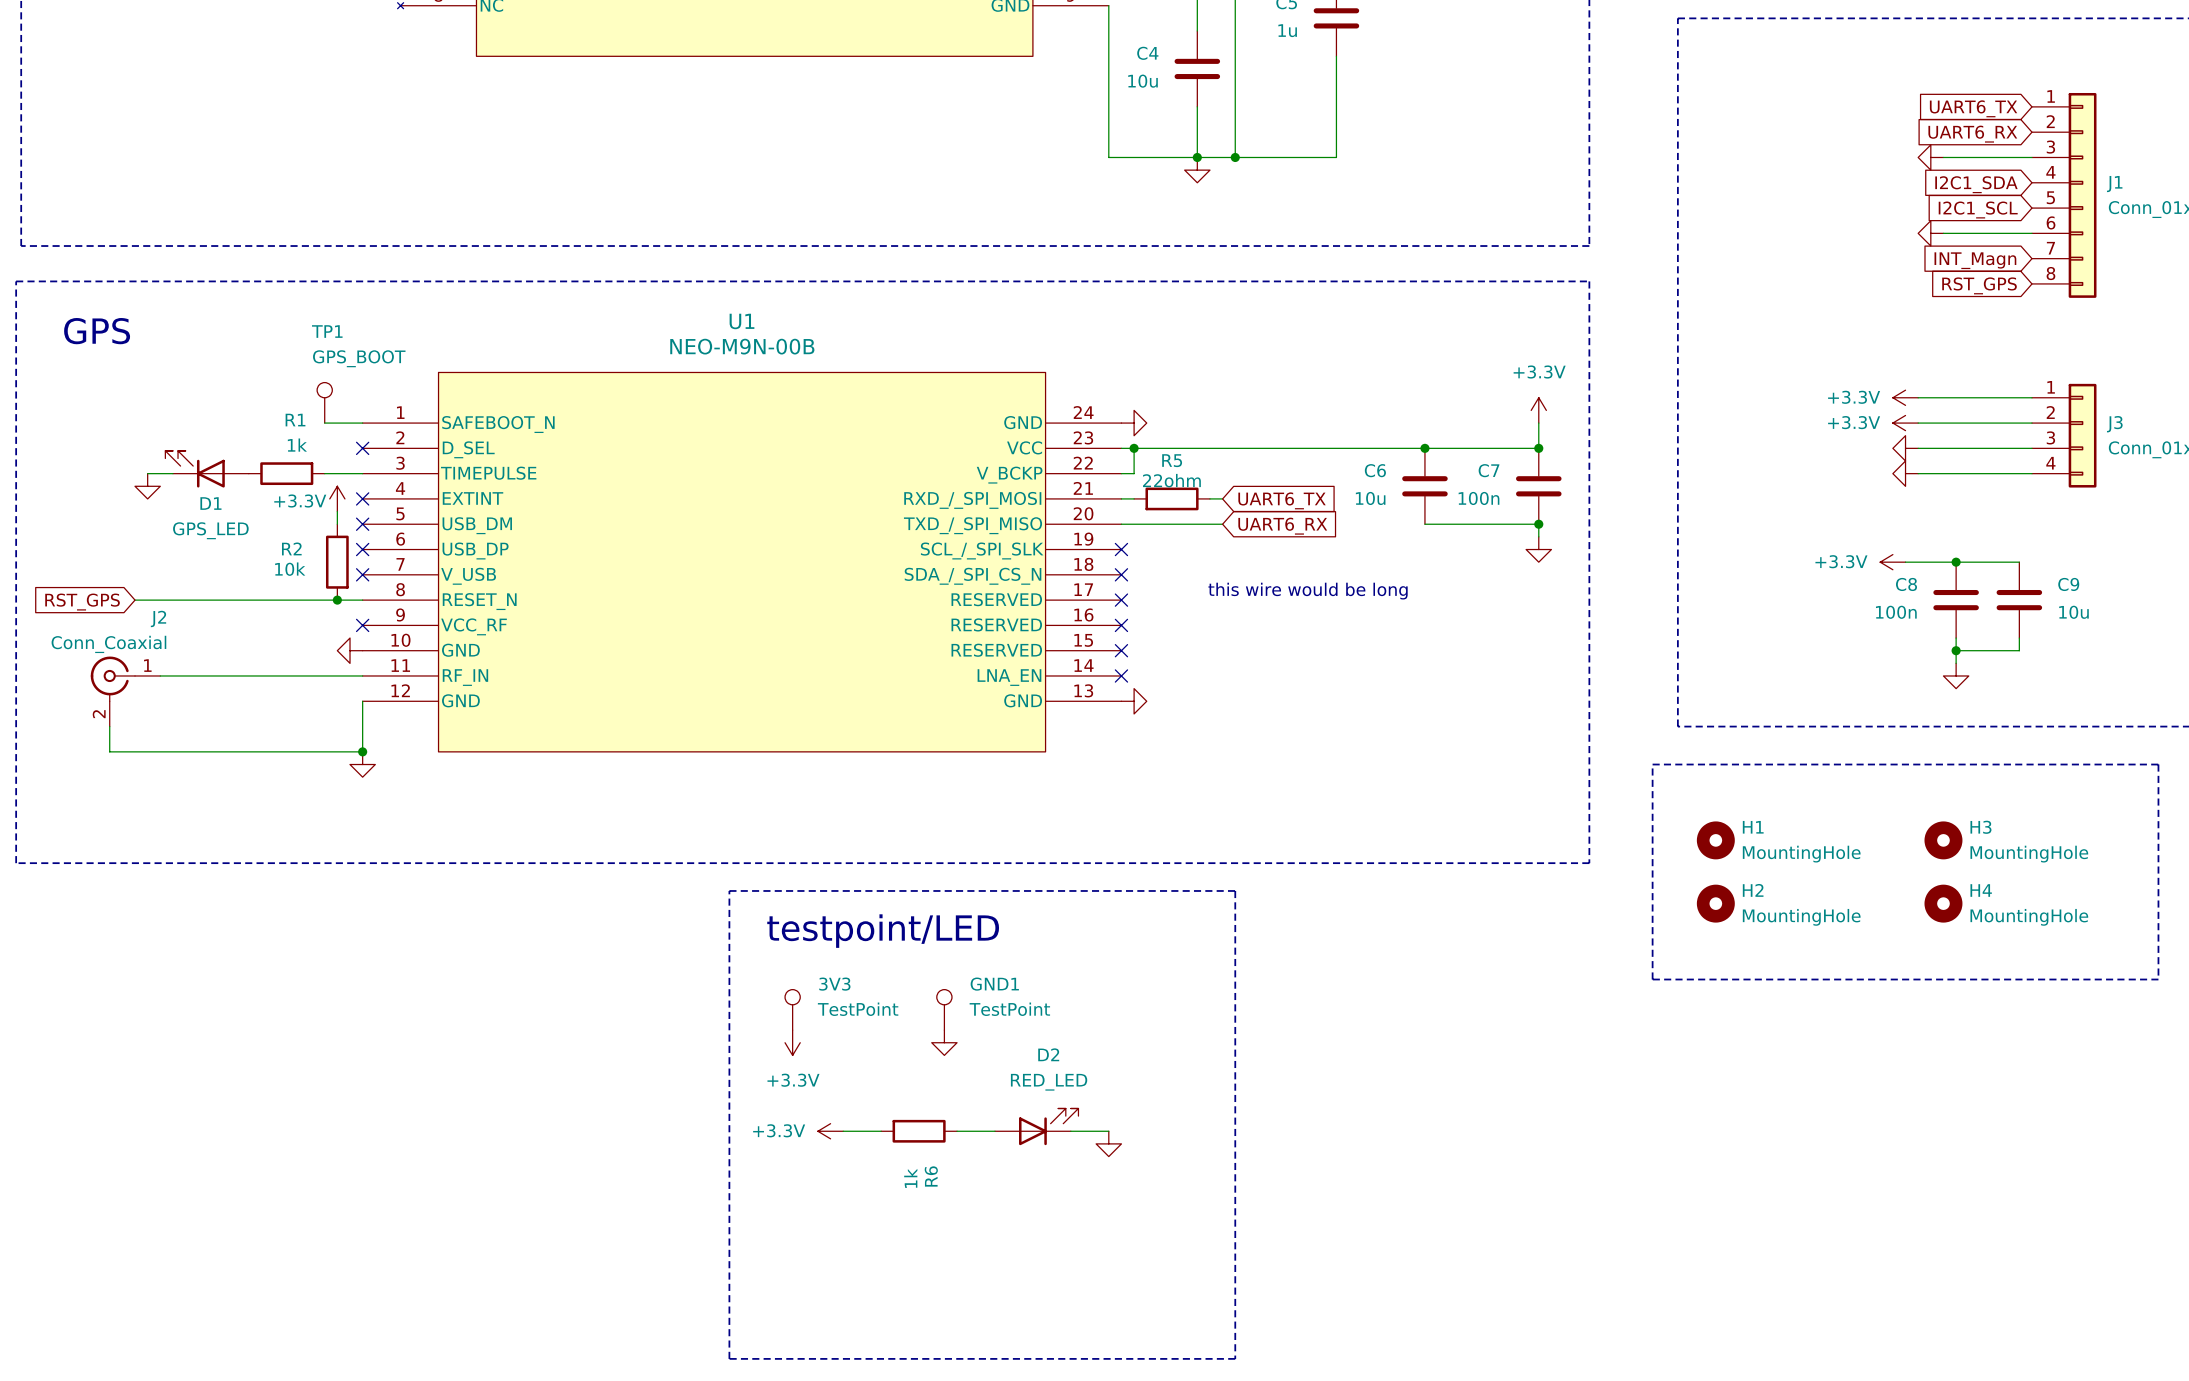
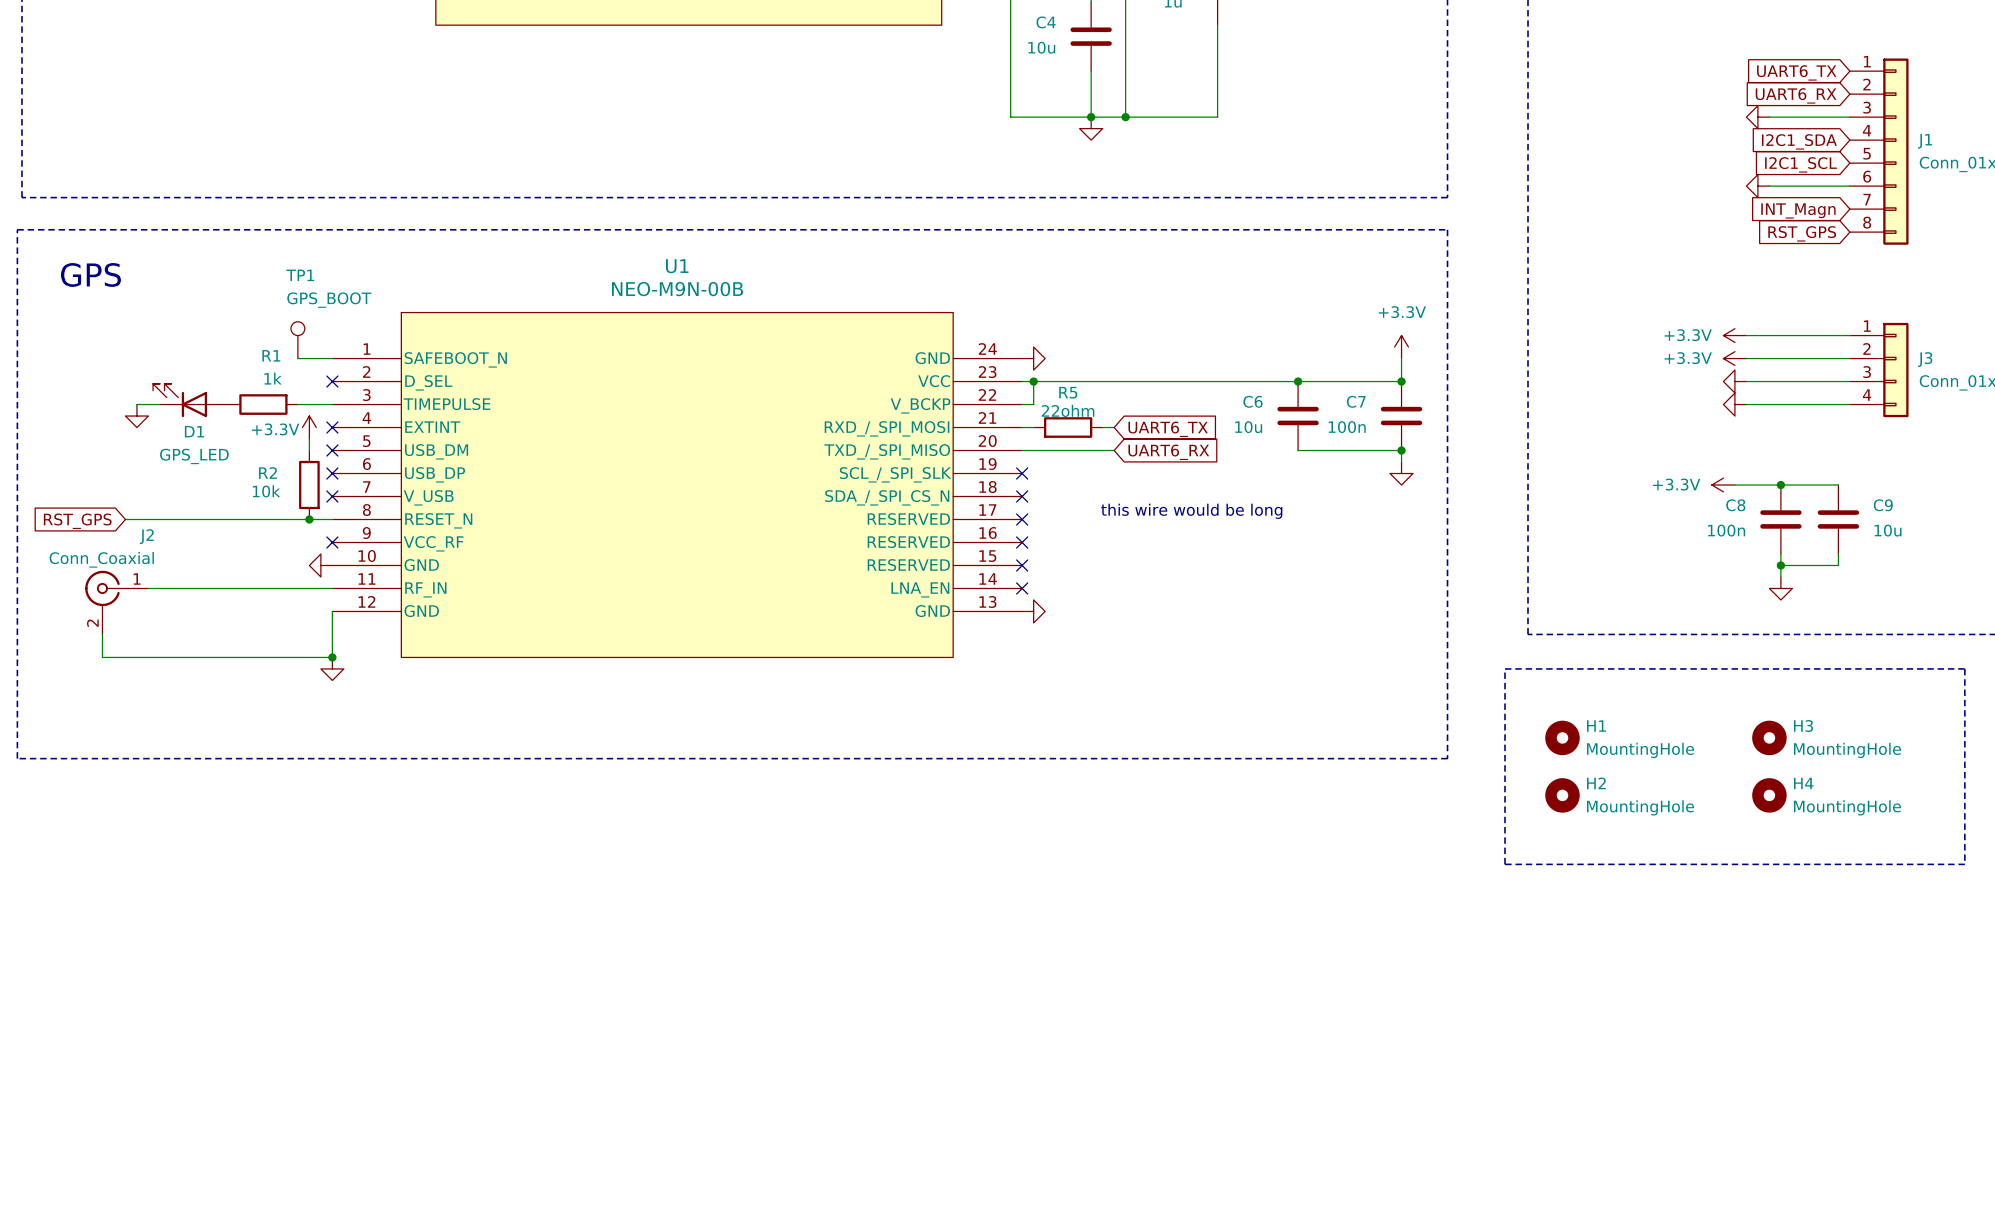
line: (729, 890) (1235, 890) (1235, 1358) (729, 1358) (729, 890) -> none
text: testpoint/LED (883, 931) -> none
3V3: TestPoint (792, 1009) -> none
GND1: TestPoint (944, 1009) -> none
power symbol: +3.3V (792, 1042) -> none
power symbol: (944, 1042) -> none
D2: RED_LED (1036, 1126) -> none
power symbol: +3.3V (830, 1131) -> none
wire: (843, 1131) (881, 1131) -> none
R6: 1k (919, 1131) -> none
wire: (957, 1131) (994, 1131) -> none
wire: (1070, 1131) (1108, 1131) -> none
power symbol: (1108, 1143) -> none

